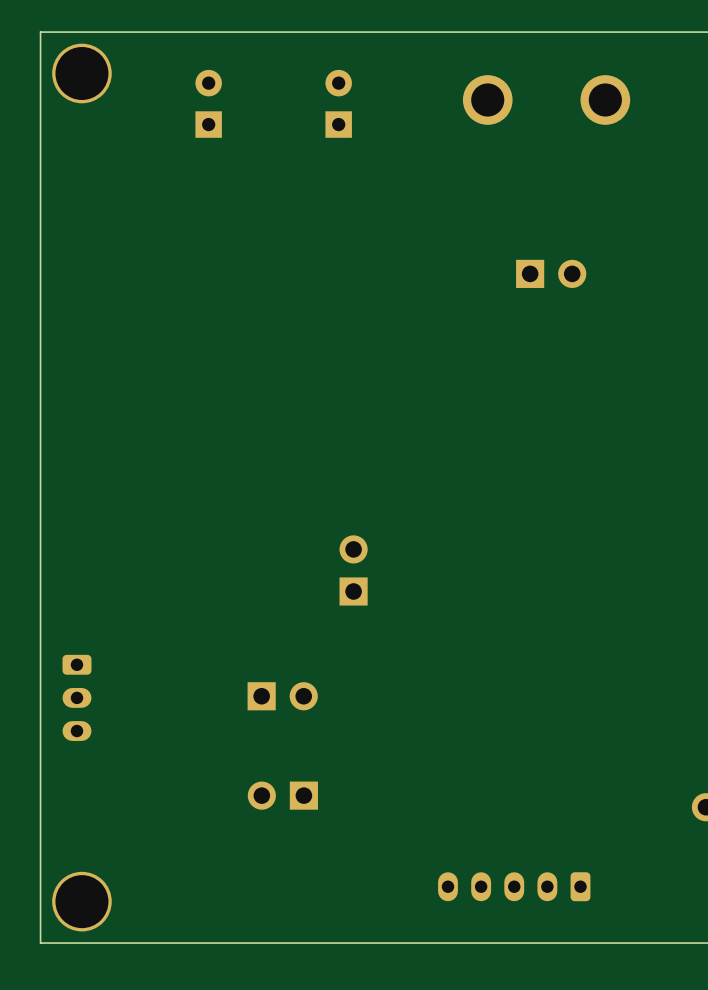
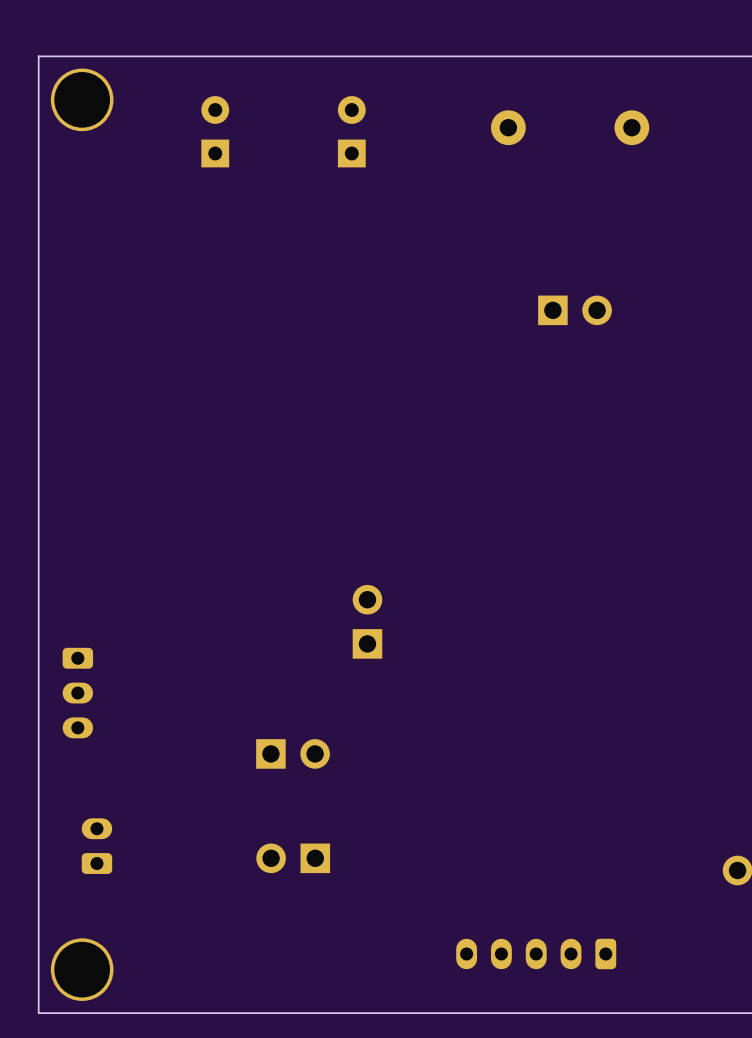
part footprint: [462, 75, 513, 125] -> [490, 110, 526, 146]
part footprint: [580, 75, 631, 125] -> [614, 110, 650, 146]
part position: (76, 697) -> (77, 693)
part: none -> (96, 846)

